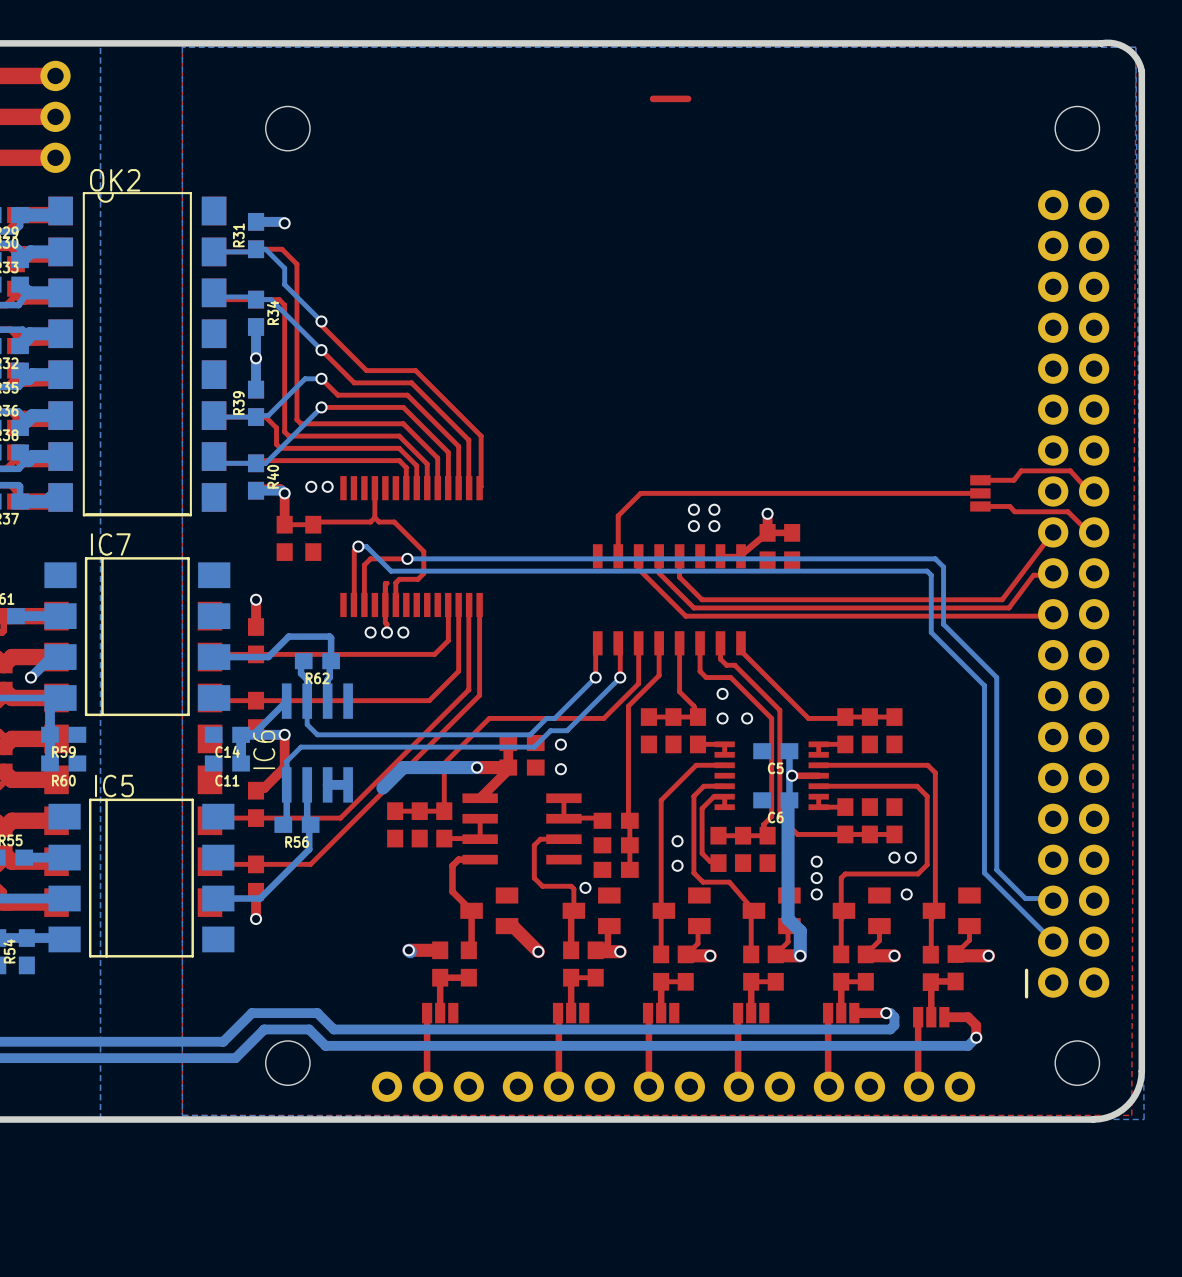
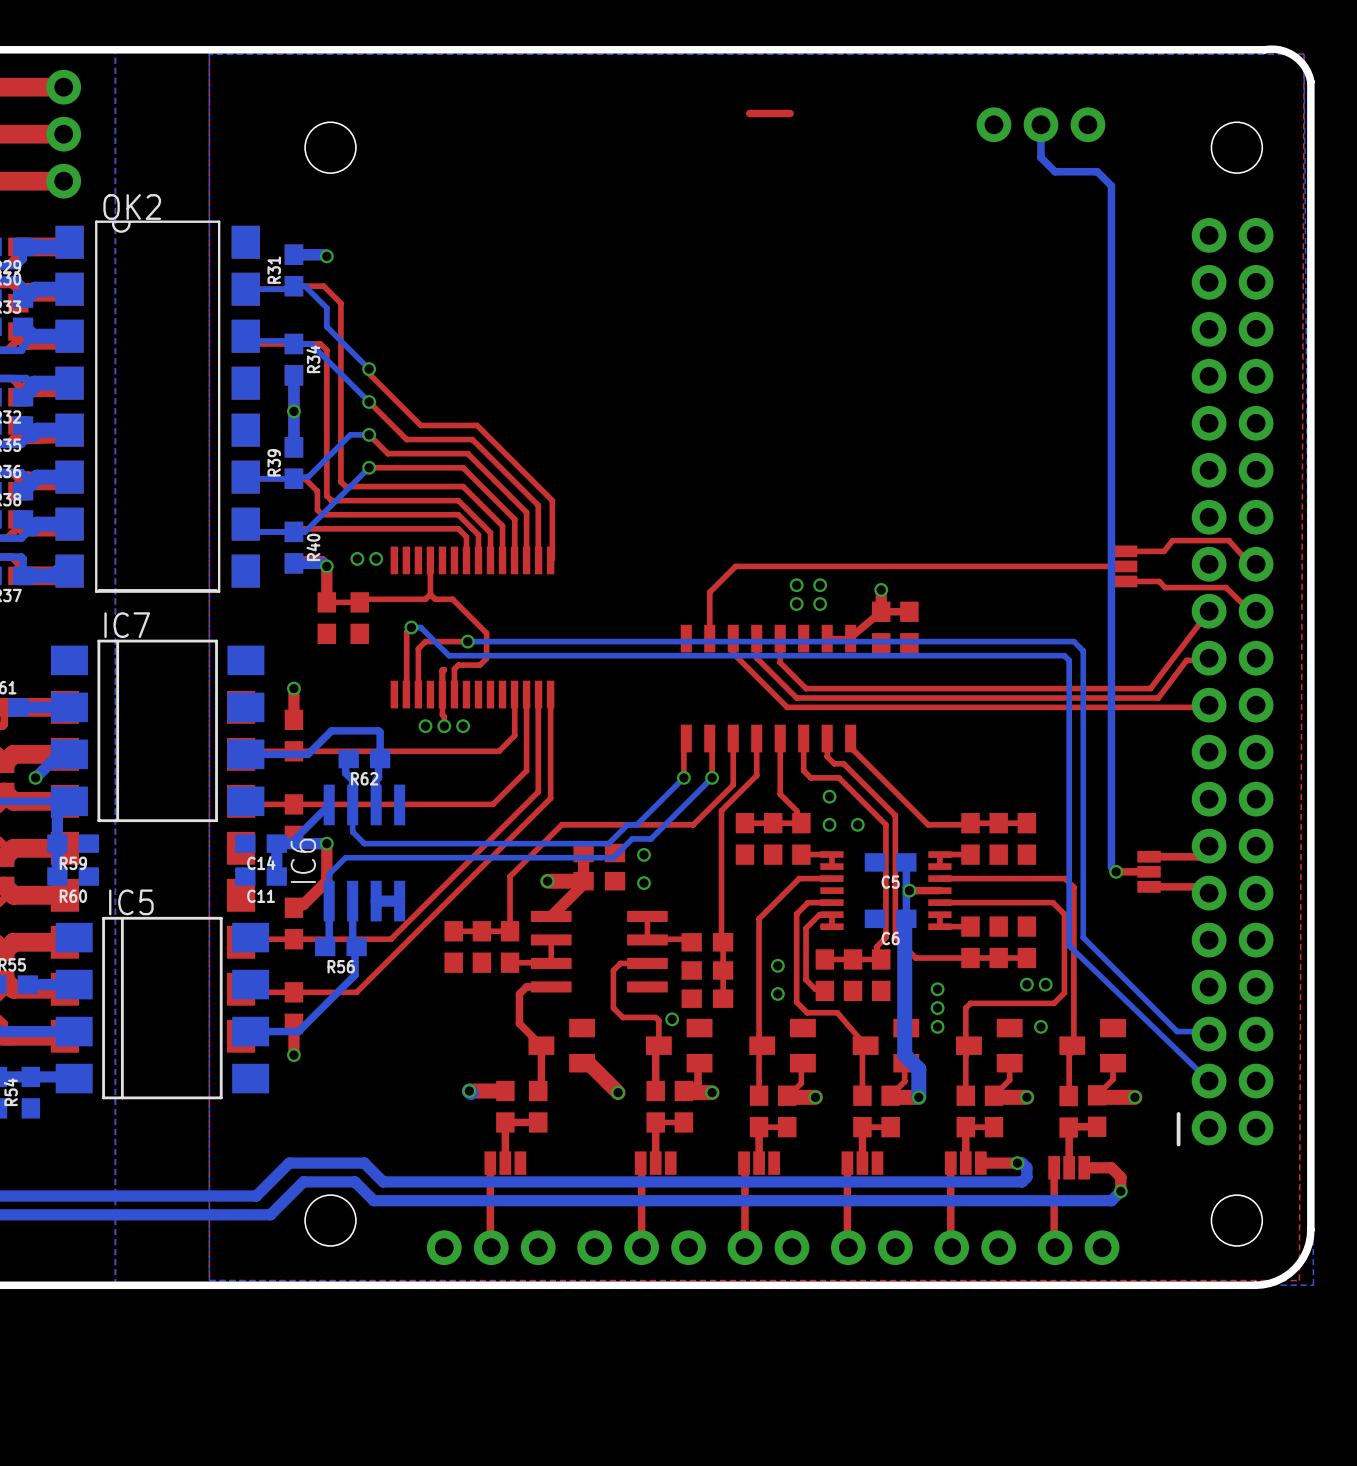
bottom track: none -> (1040, 124) (1040, 157) (1055, 171) (1097, 171) (1111, 185) (1111, 867) (1116, 871)
part: none -> (1040, 124)
bottom track: (943, 624) (996, 677) (996, 869) -> (1083, 716) (1083, 937) (1144, 998)
bottom track: (931, 632) (984, 685) (984, 872) (1053, 941) -> (1069, 726) (1069, 945) (1209, 1081)
top track: none -> (1209, 846) (1198, 856) (1149, 856)
via: none -> (1116, 871)
top track: none -> (1149, 871) (1116, 871)
part: none -> (1149, 871)
bottom track: (477, 767) (403, 767) (382, 788) -> none
top track: none -> (1149, 886) (1202, 886) (1209, 893)

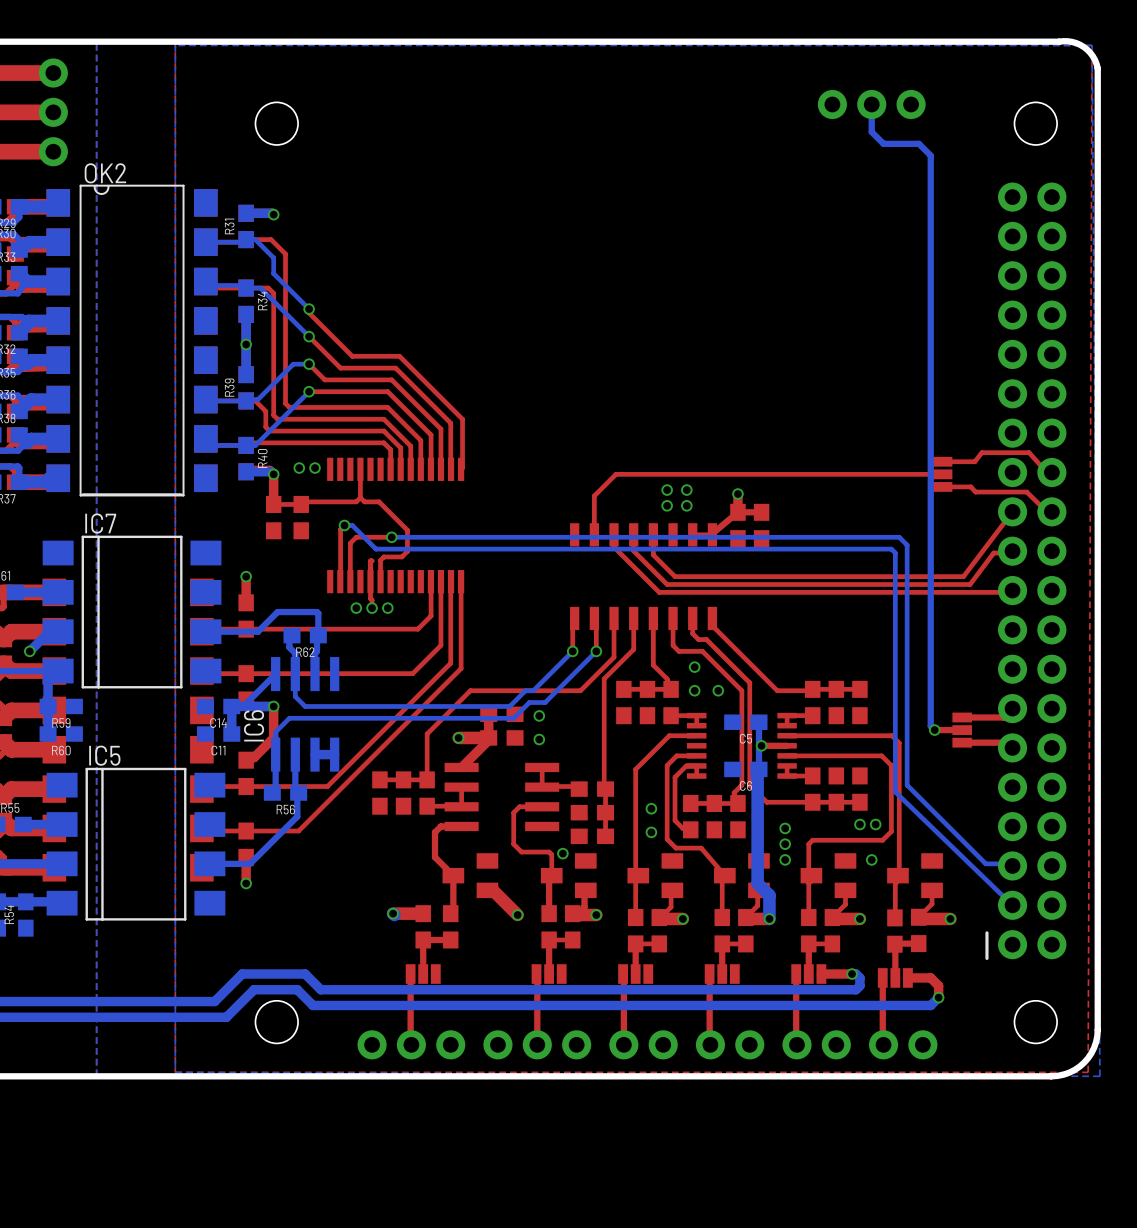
top track: (790, 113) (749, 113) -> none

